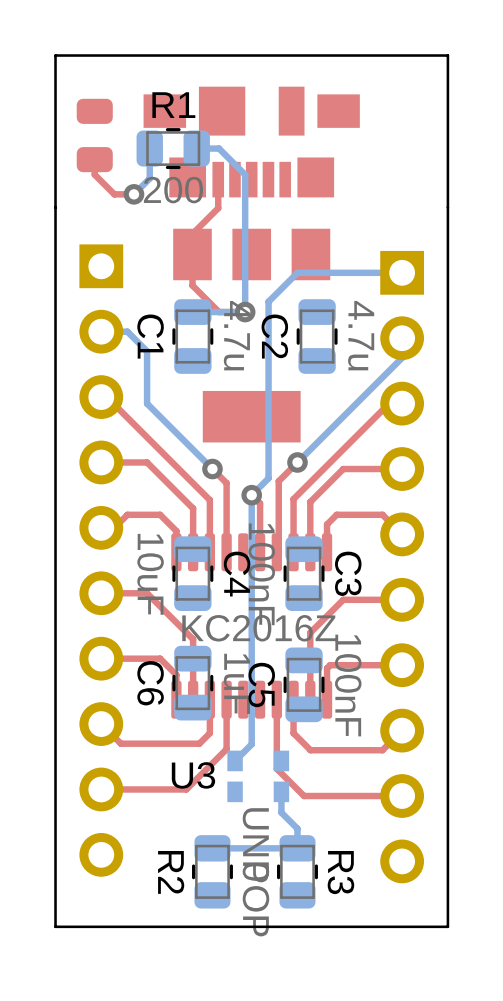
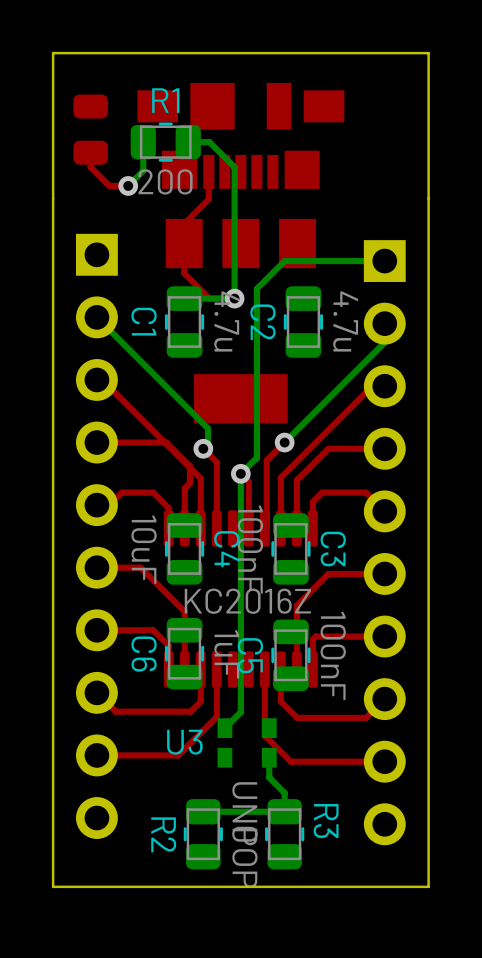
bottom track: (101, 331) (127, 331) (147, 351) (147, 403) (212, 469) -> (96, 317) (207, 428) (207, 443)
top track: (147, 462) (193, 510) -> (140, 442) (166, 442) (189, 466) (189, 483) (184, 488)
R3 name position: R3 (340, 872) -> R3 (326, 821)

